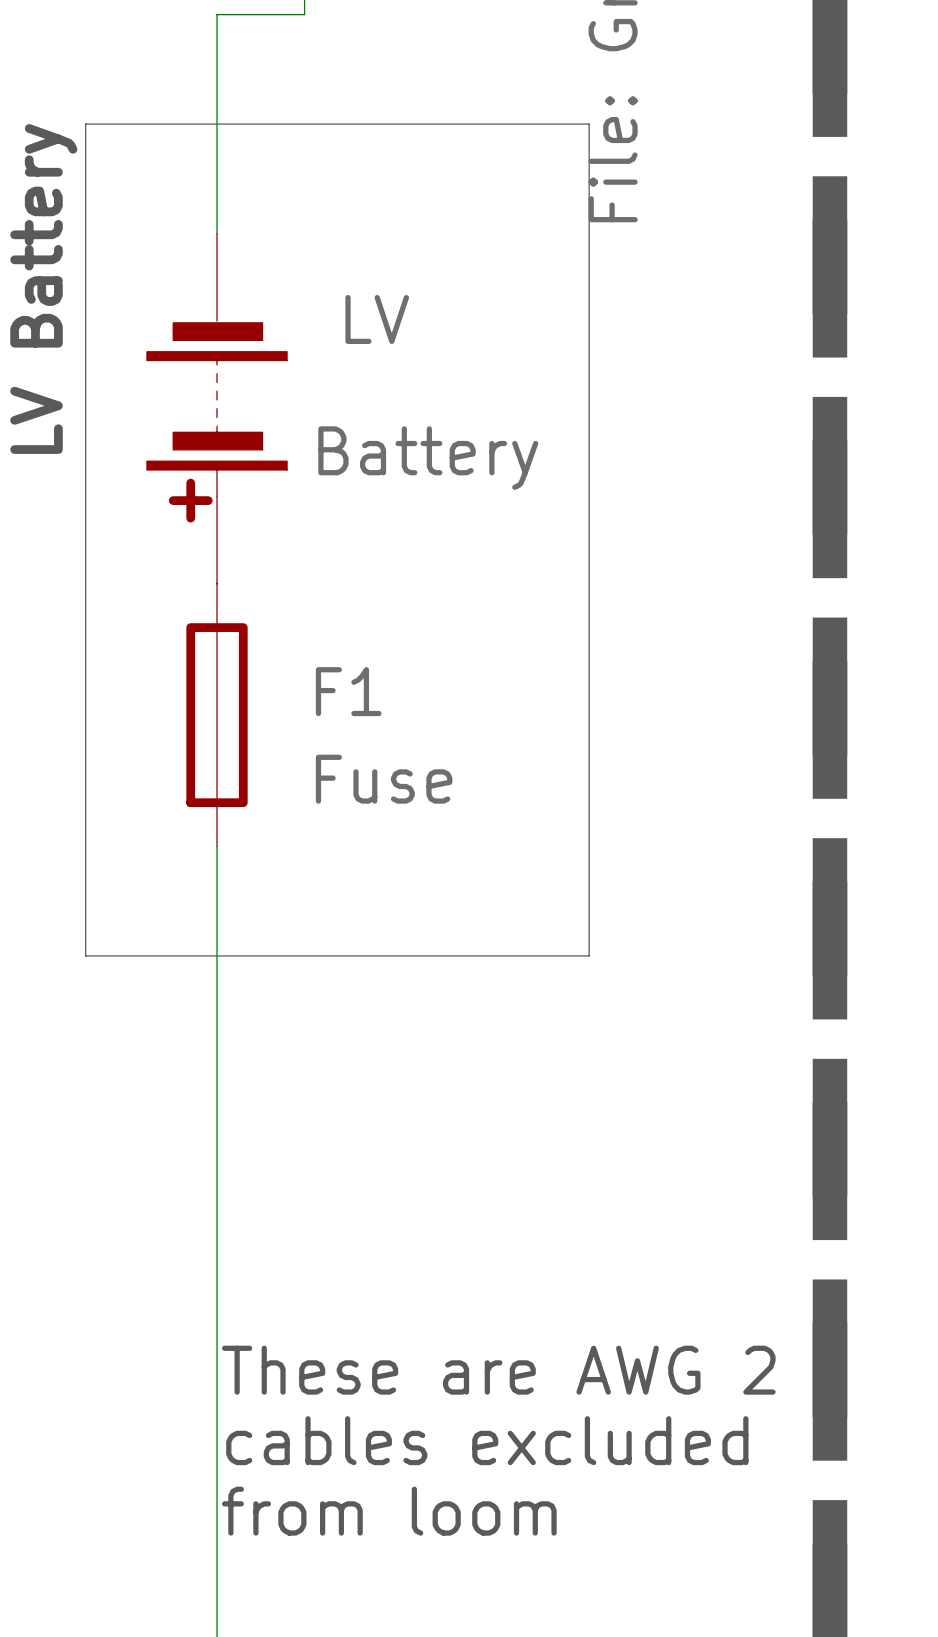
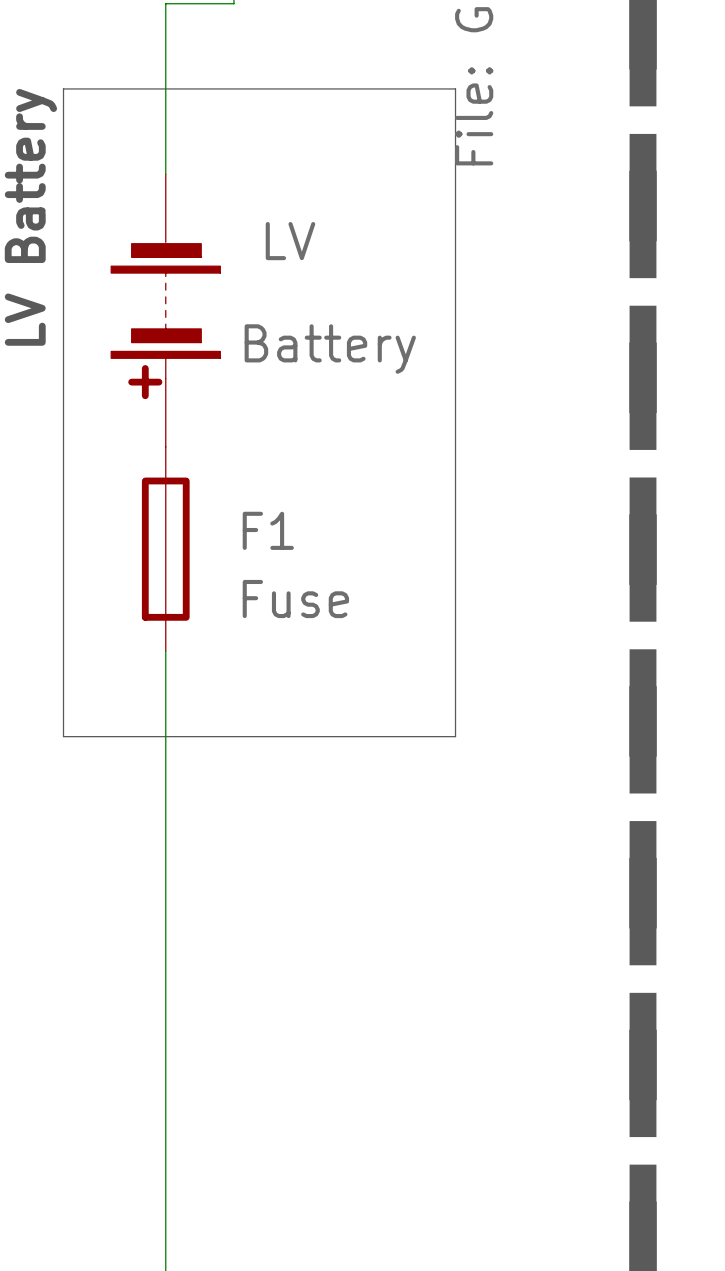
text: These are AWG 2 (498, 1370) -> none
text: cables excluded (487, 1440) -> none
text: from loom (389, 1511) -> none

